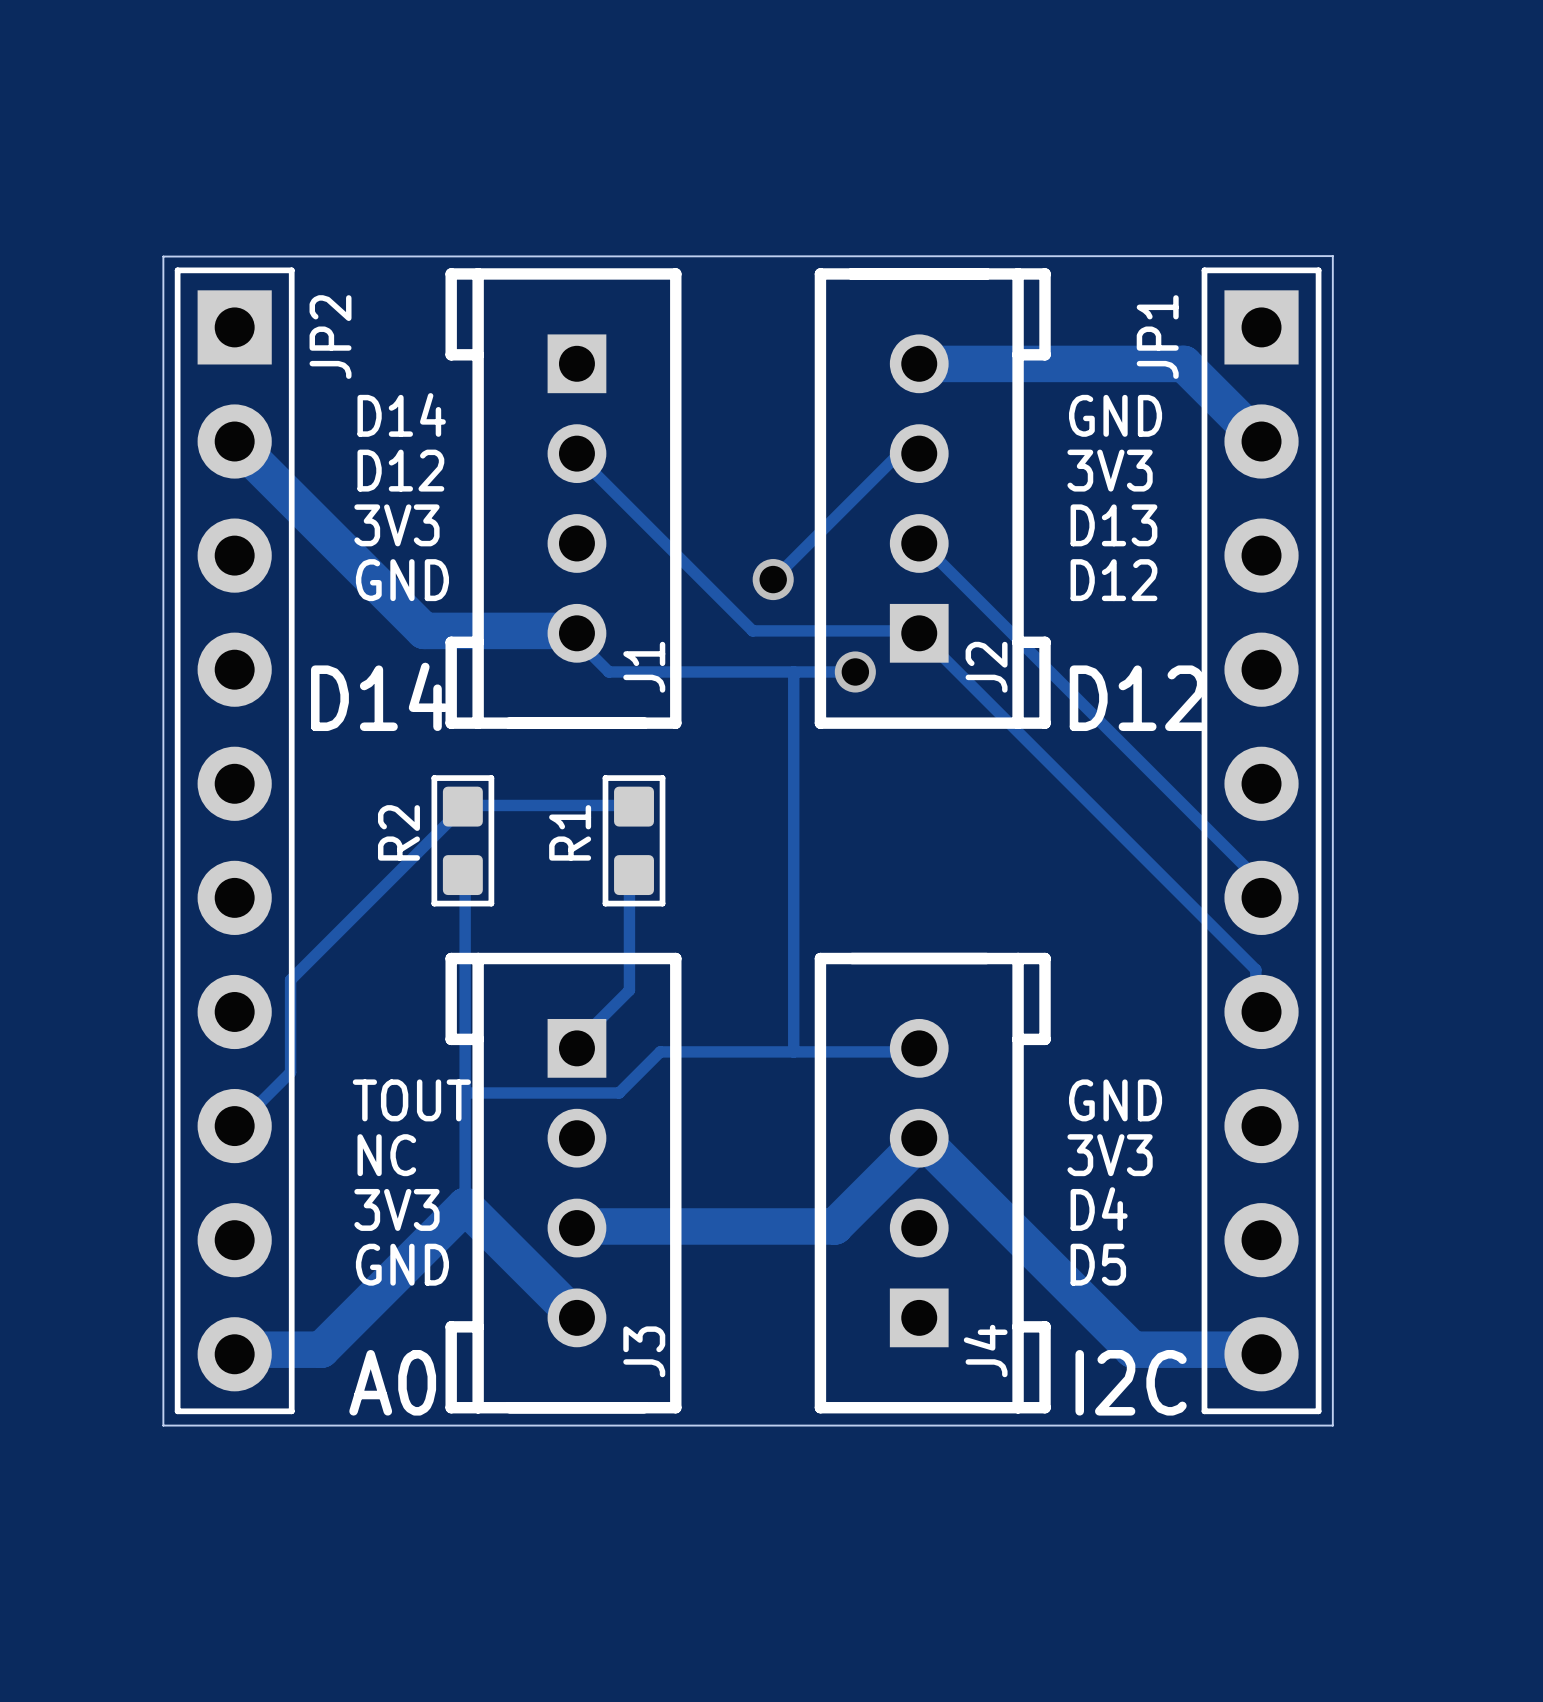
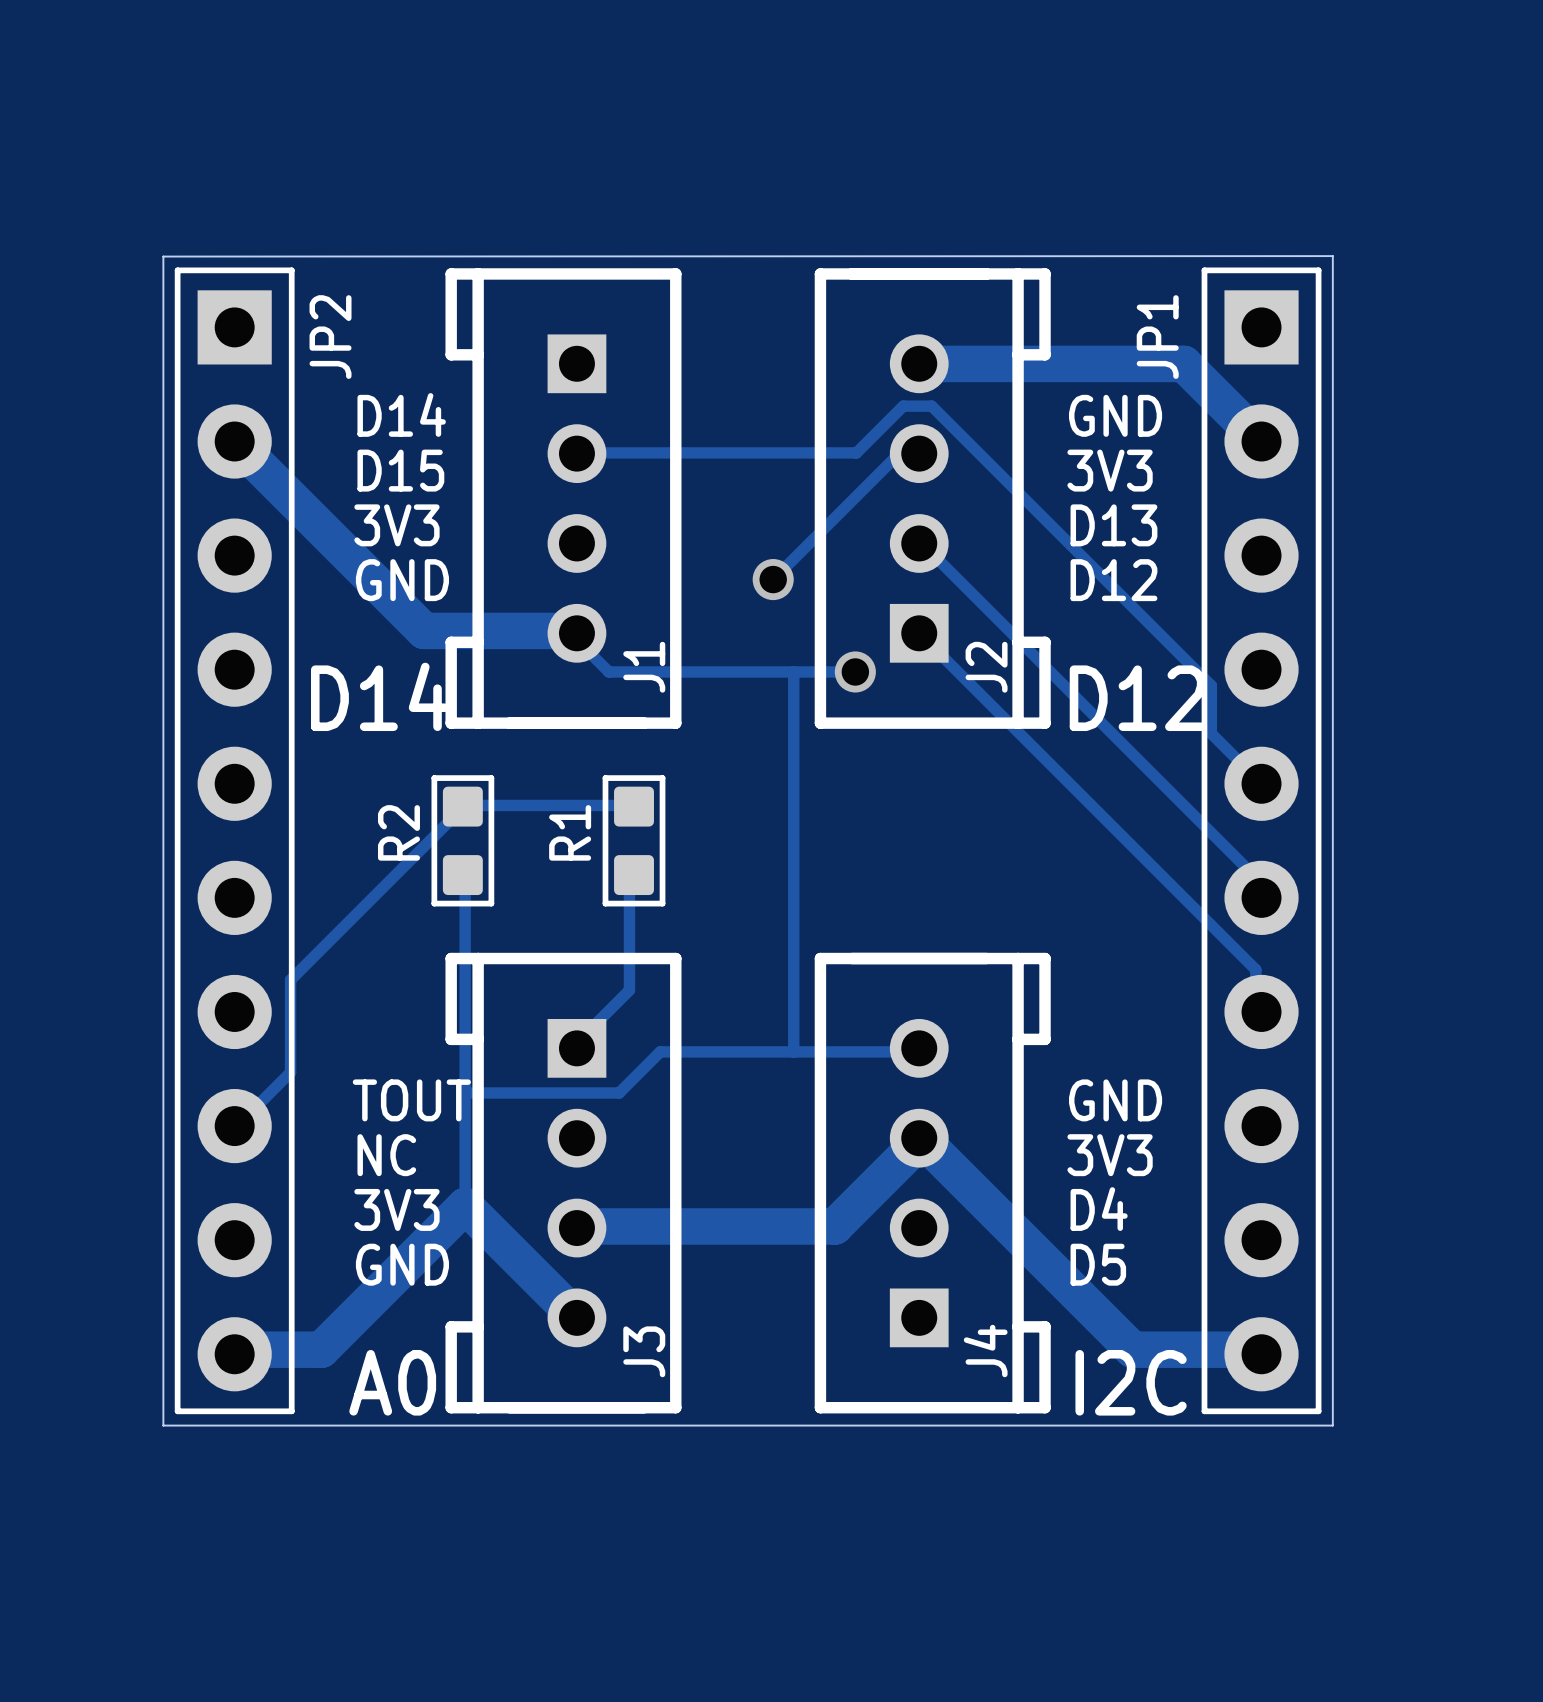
track: (576, 453) (752, 630) (916, 630) -> (576, 453) (856, 452) (903, 406) (931, 406) (1211, 685) (1211, 733) (1261, 783)
text: D12 (400, 470) -> D15 (400, 470)

